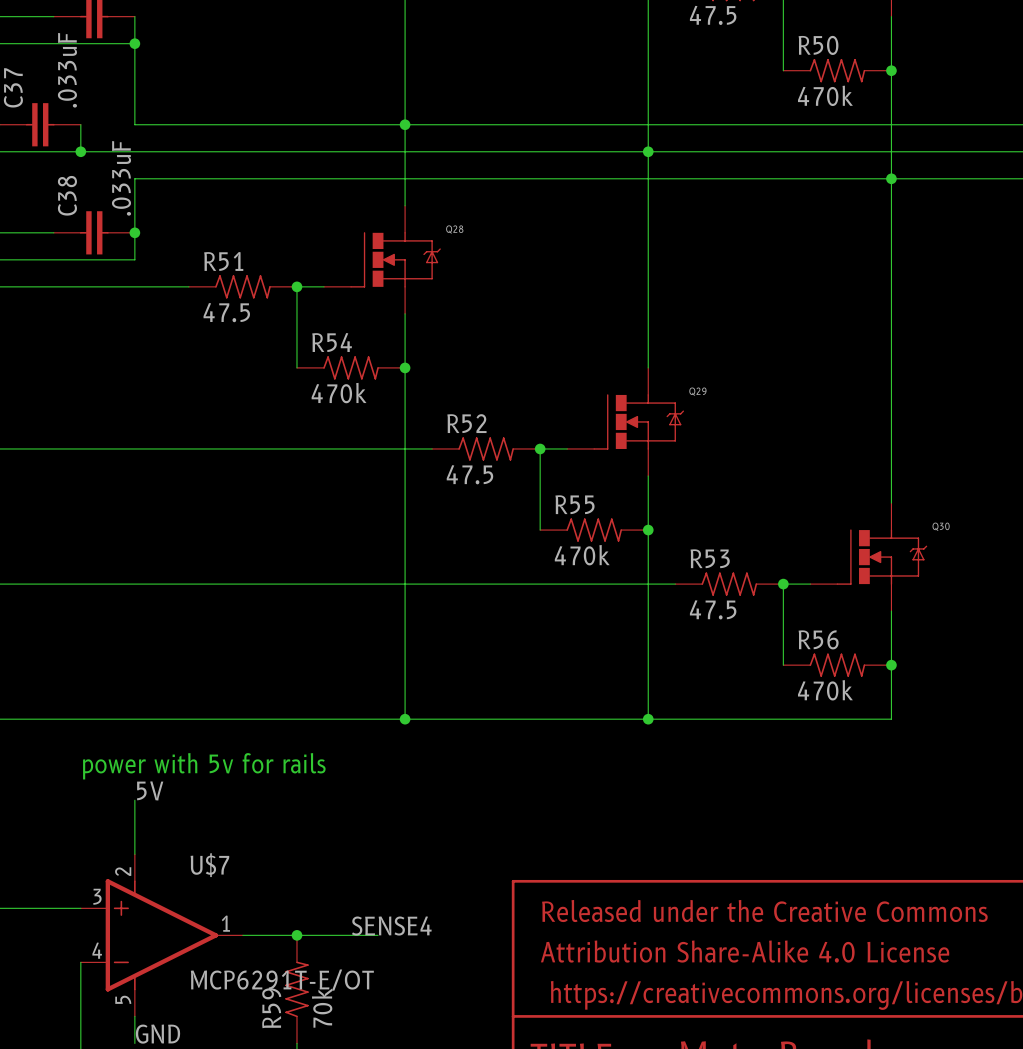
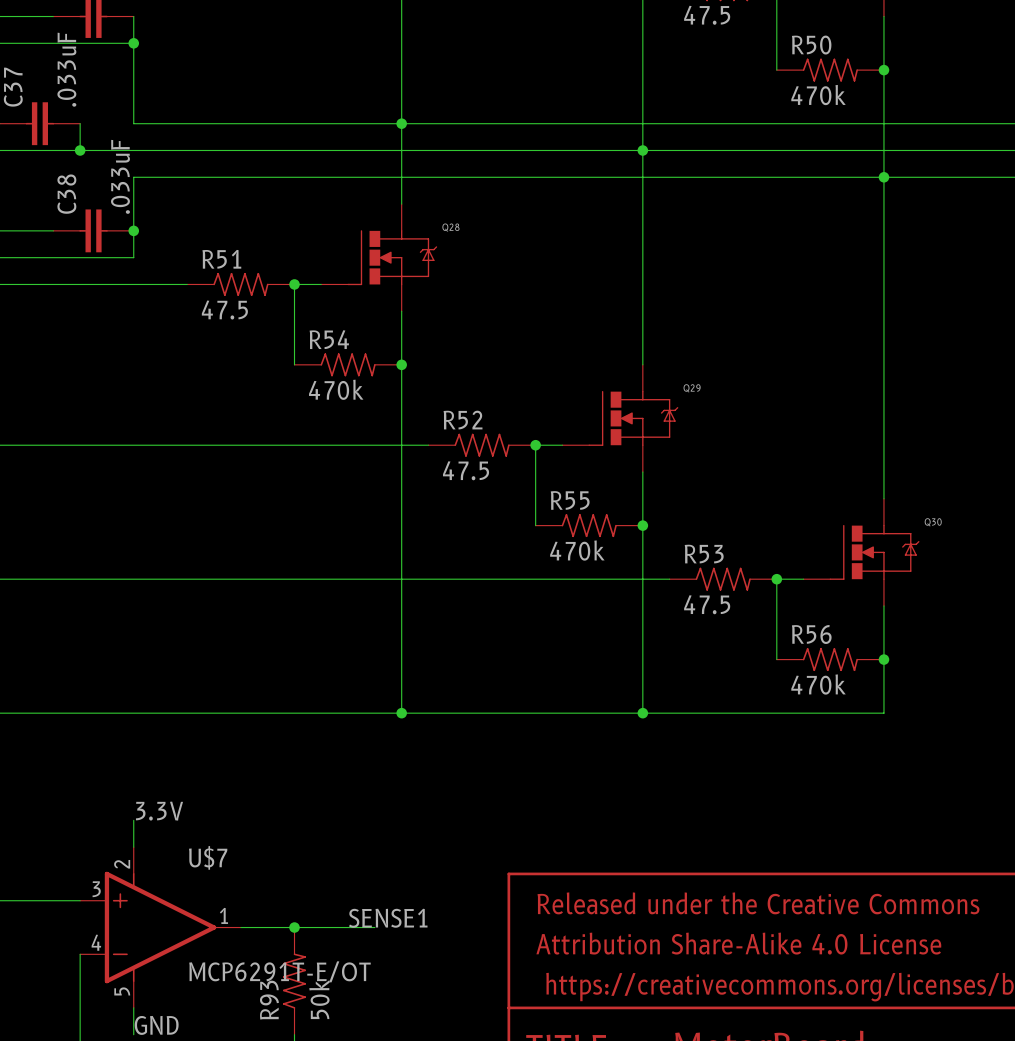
text: power with 5v for rails (204, 766) -> none
label: 5V (150, 790) -> none
wire: (134, 800) (134, 827) -> none
label: none -> 3.3V (159, 811)
label: SENSE4 (391, 926) -> SENSE1 (388, 918)
R59 name: R59 (271, 1008) -> R93 (269, 1000)
R59 value: 70k (322, 1008) -> 50k (319, 999)

